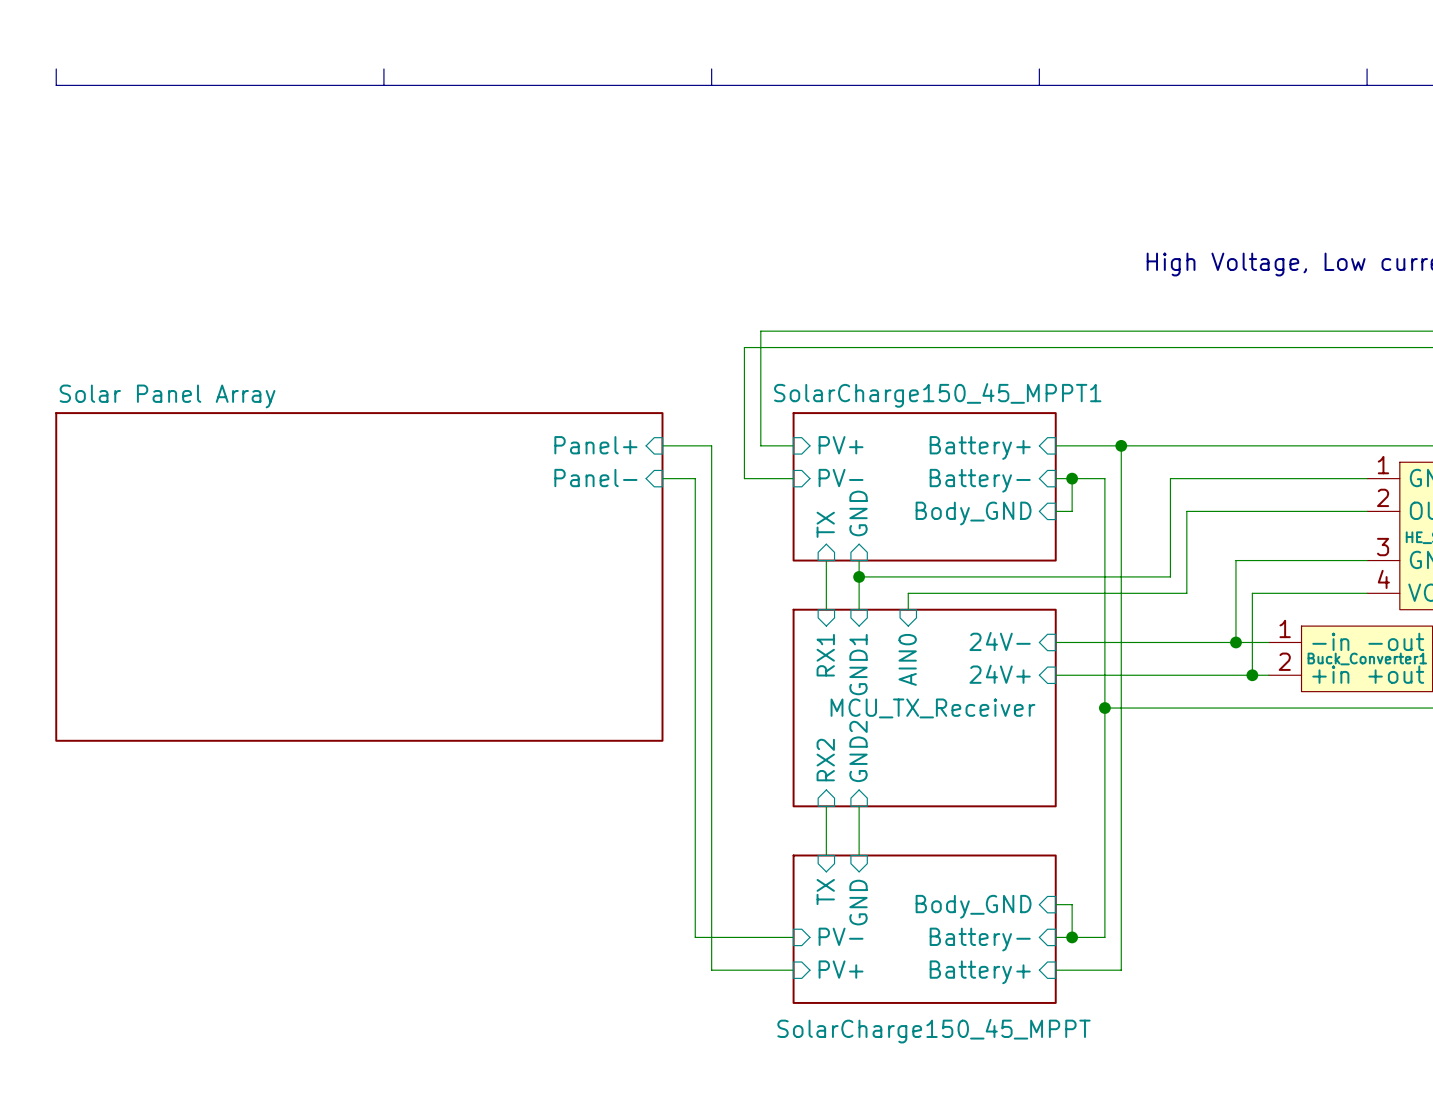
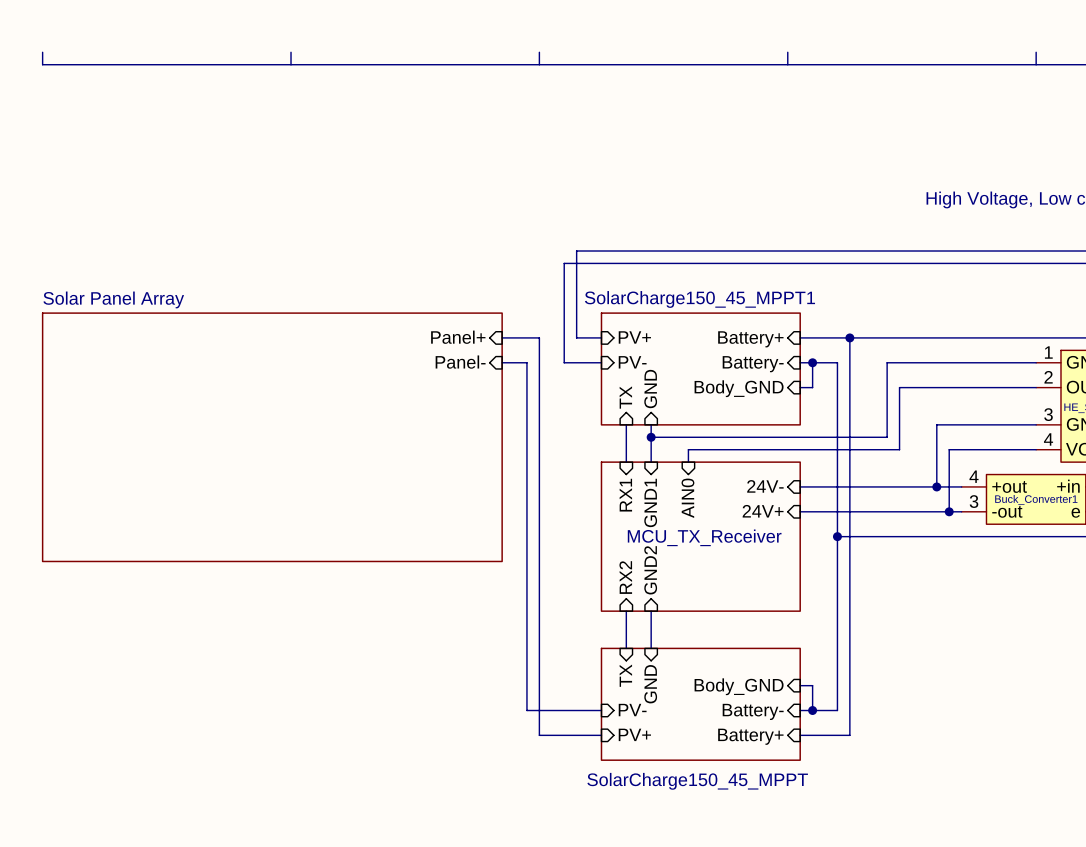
Buck_Converter1 pin number: 1 (1285, 628) -> 4 (974, 476)
Buck_Converter1 pin name: -in (1330, 641) -> +out (1009, 486)
Buck_Converter1 pin name: -out (1396, 641) -> +in (1068, 486)
Buck_Converter1 pin number: 2 (1284, 661) -> 3 (974, 501)
Buck_Converter1 pin name: +in (1330, 674) -> -out (1007, 511)
Buck_Converter1 pin name: +out (1396, 674) -> e (1075, 512)

